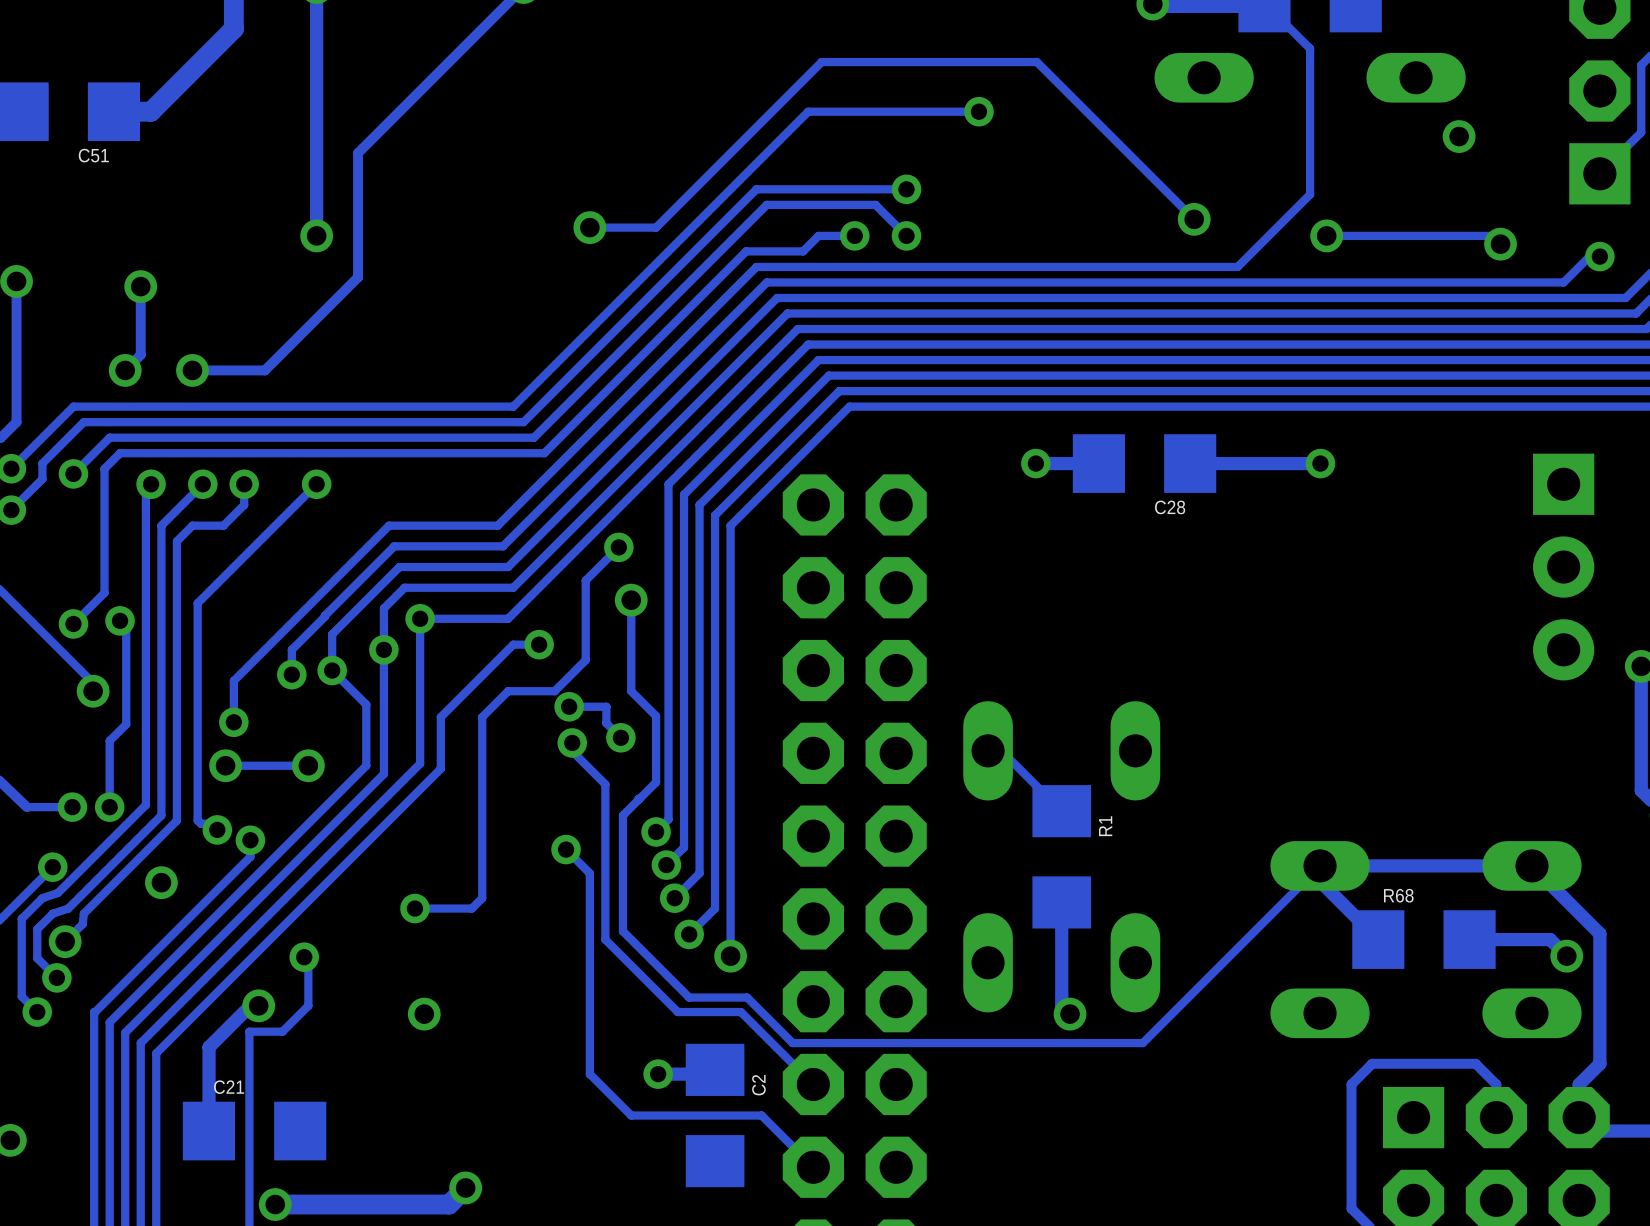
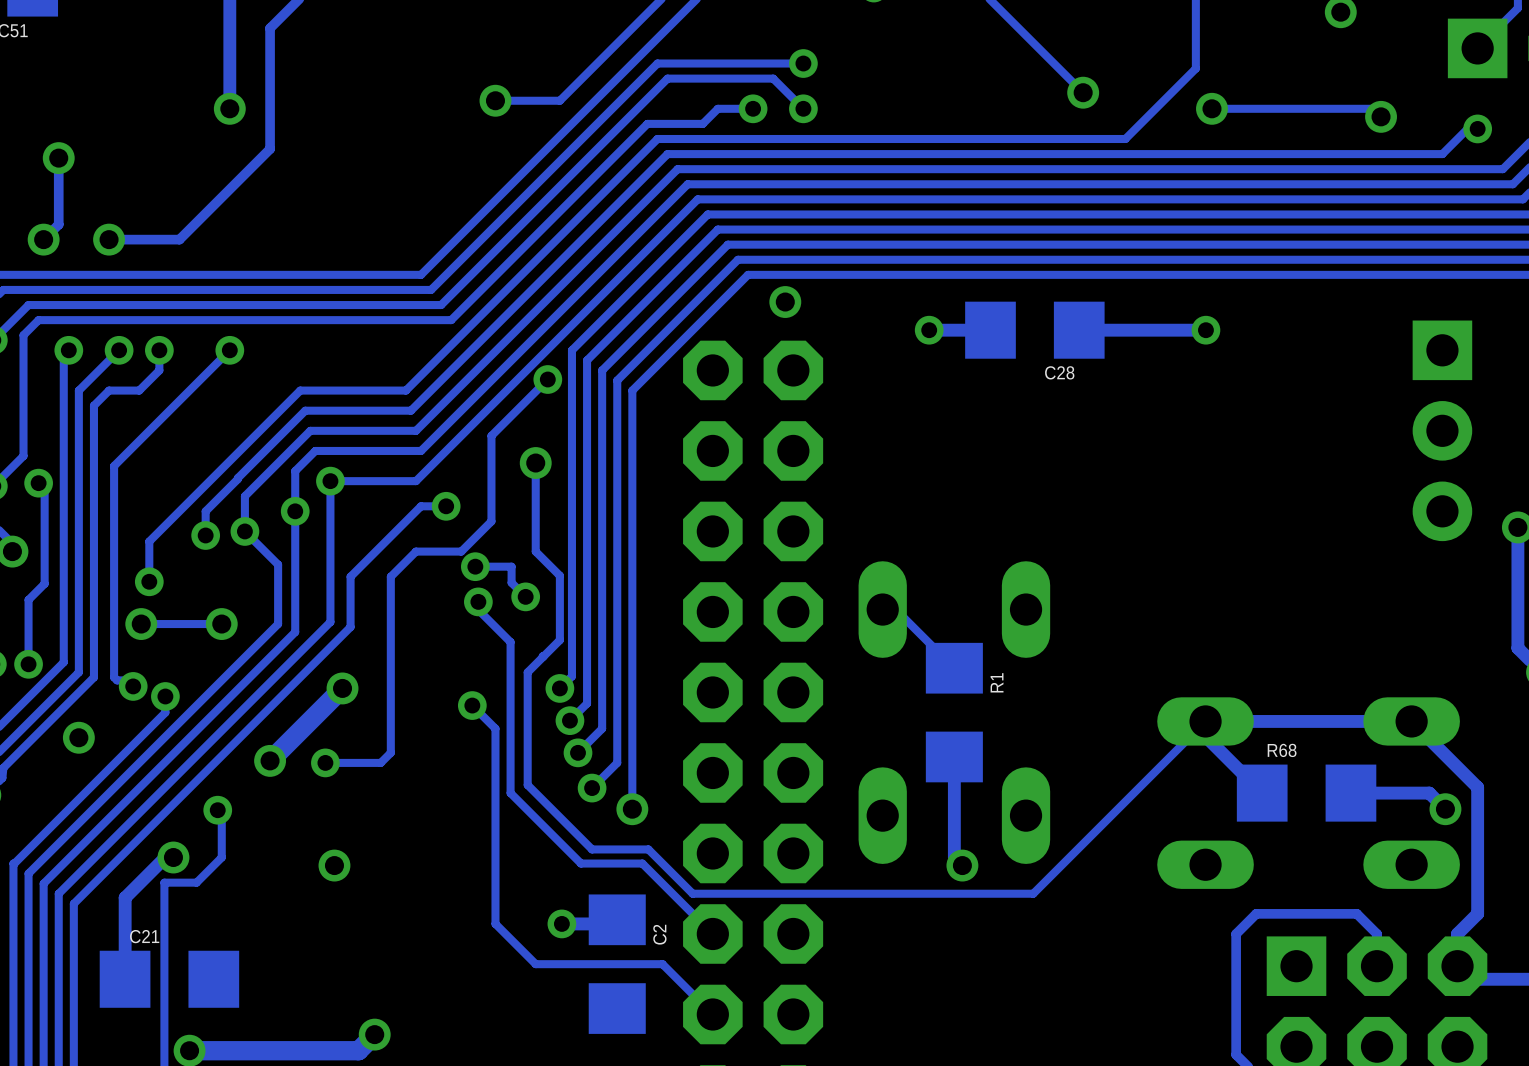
via: none -> (785, 302)
track: (618, 547) (585, 580) (585, 660) -> (547, 379) (491, 435) (491, 521)
via position: (618, 547) -> (547, 379)
track: none -> (342, 688) (270, 760)
via: none -> (342, 688)
via: none -> (270, 760)

